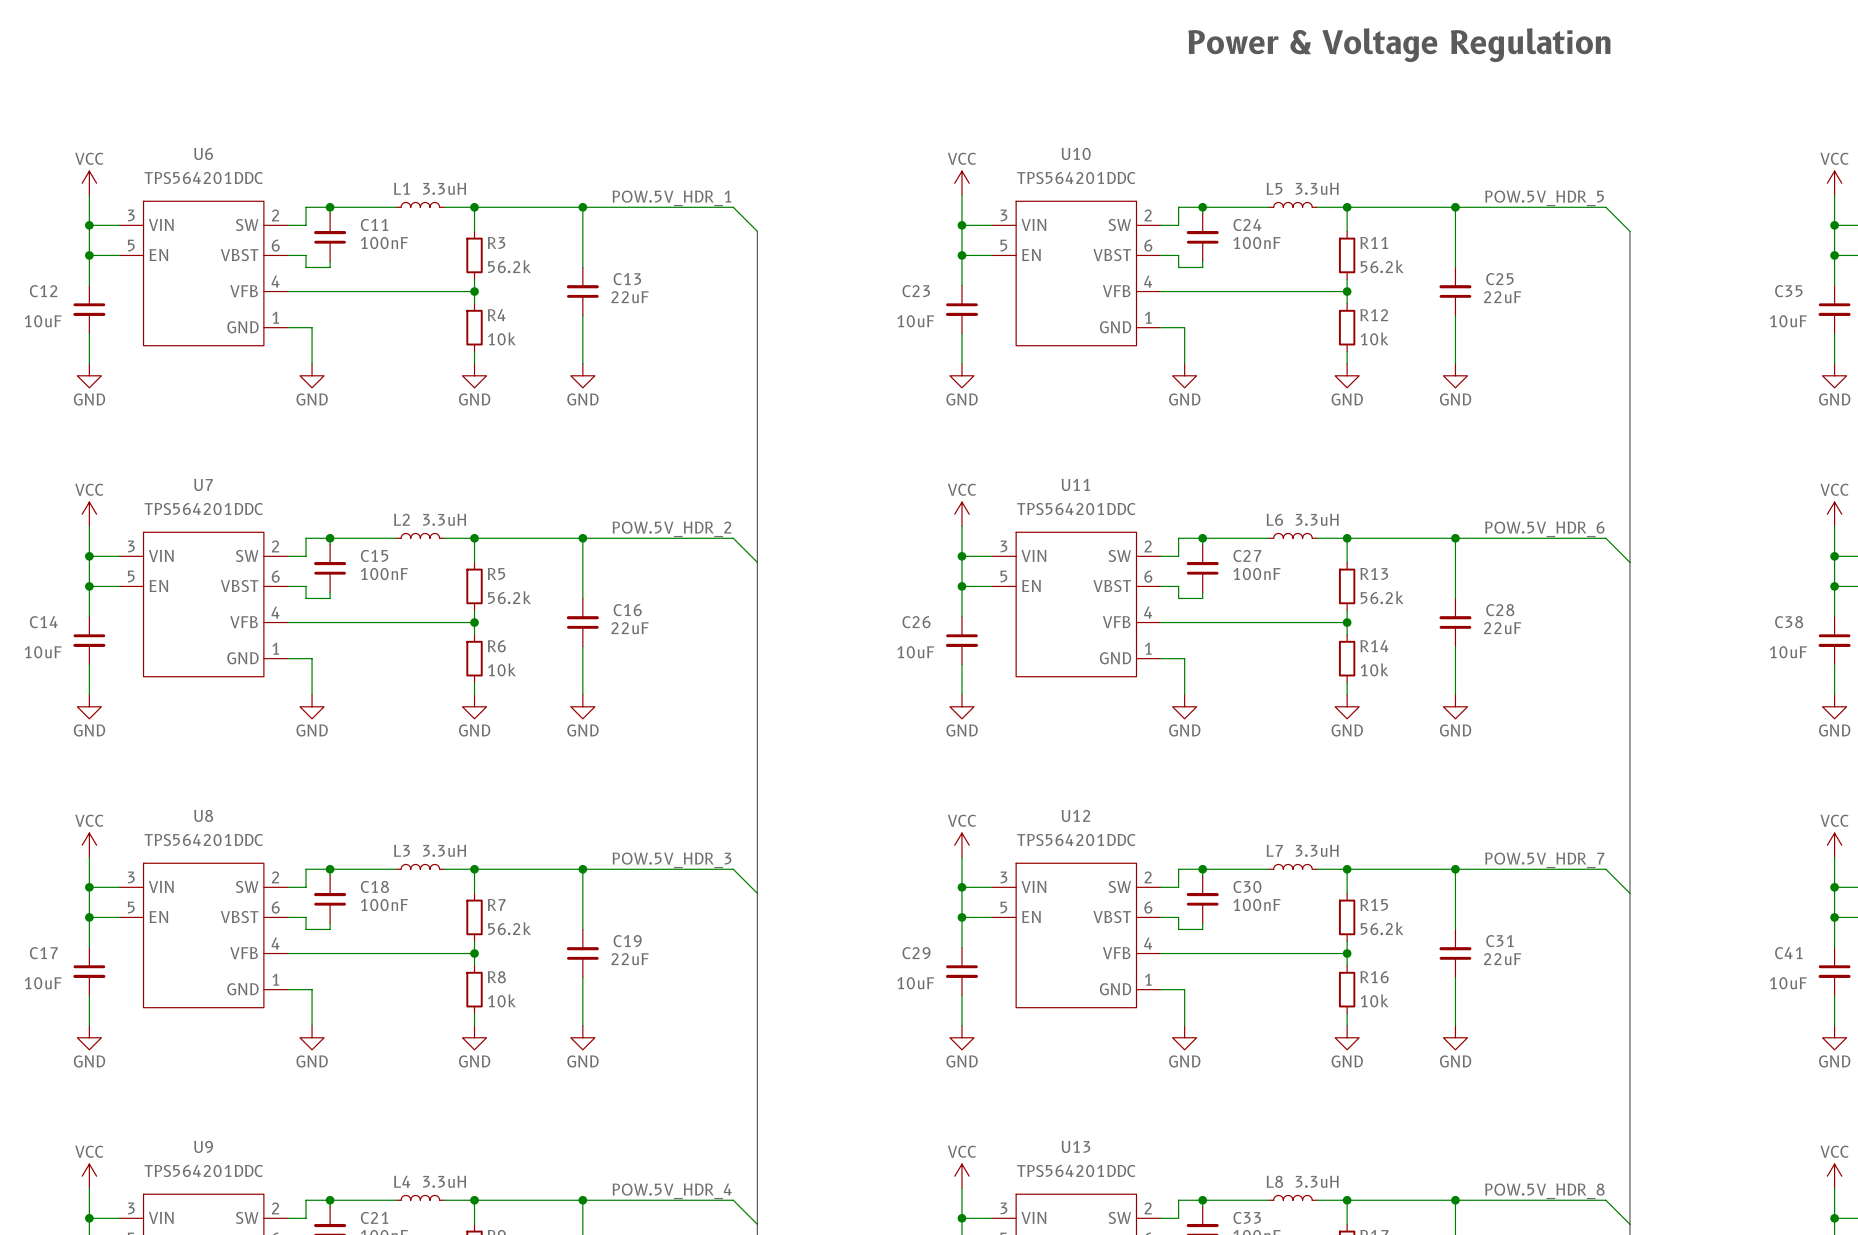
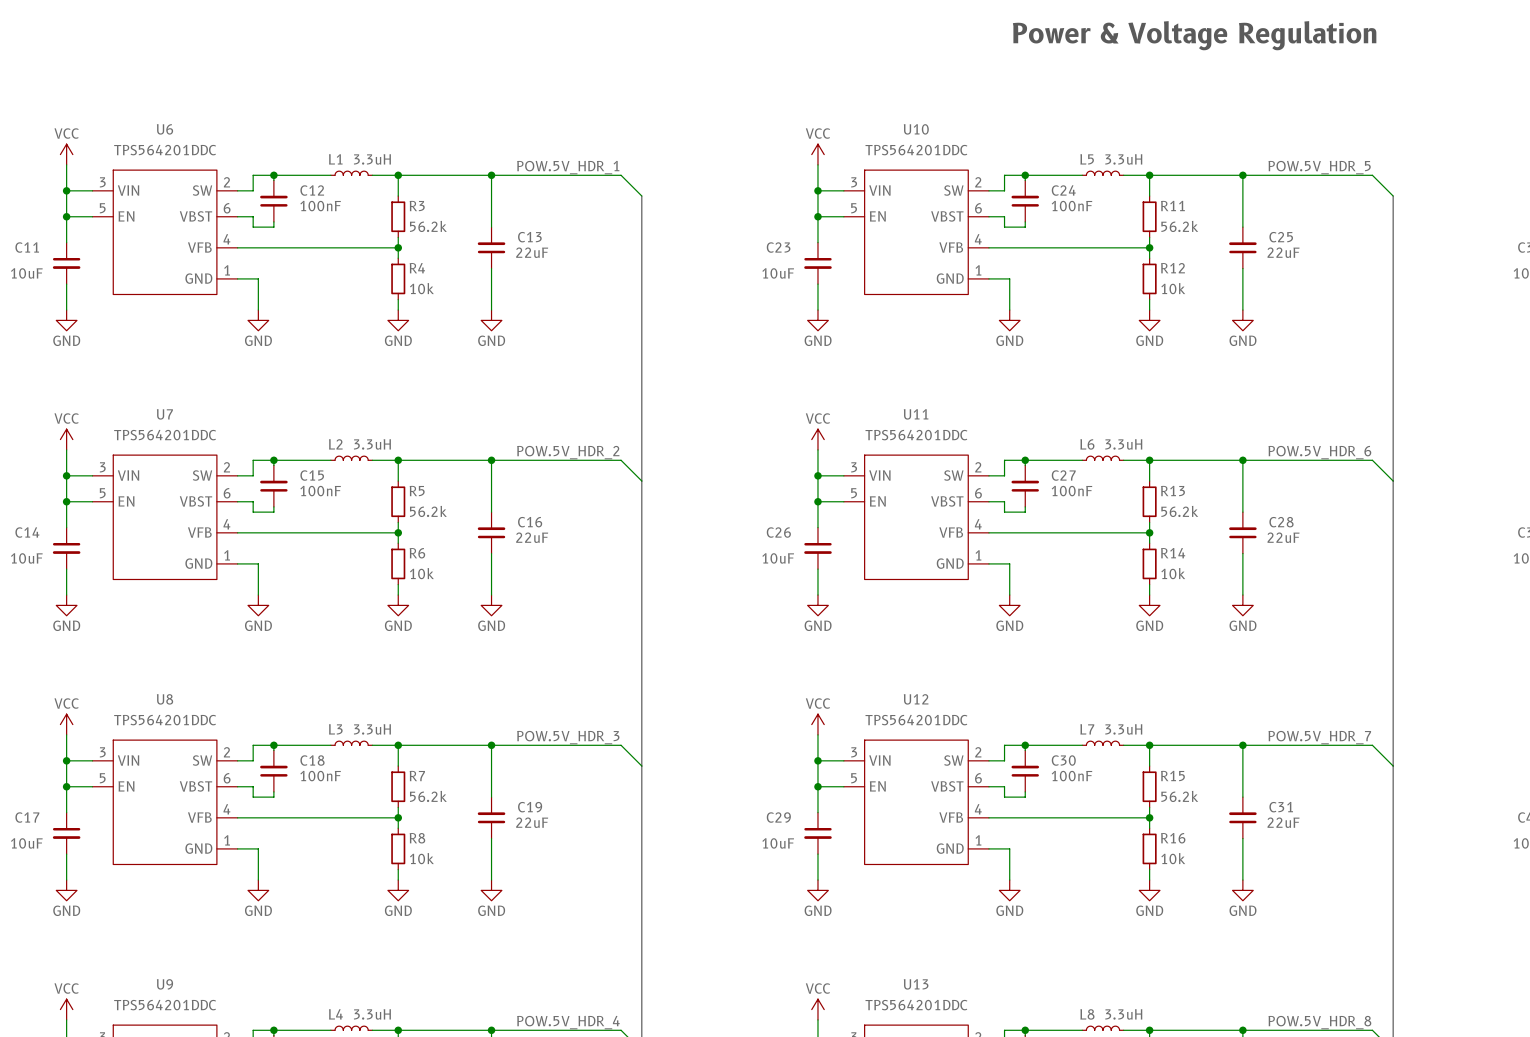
C11 name: C11 (374, 224) -> C12 (312, 190)
C12 name: C12 (43, 291) -> C11 (27, 247)

